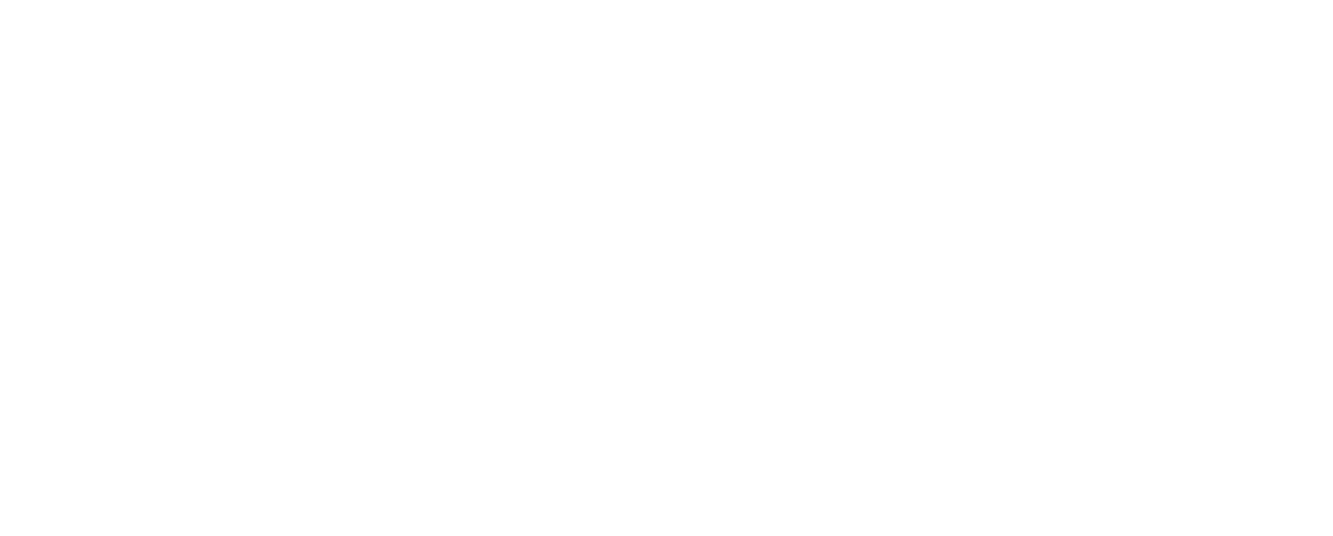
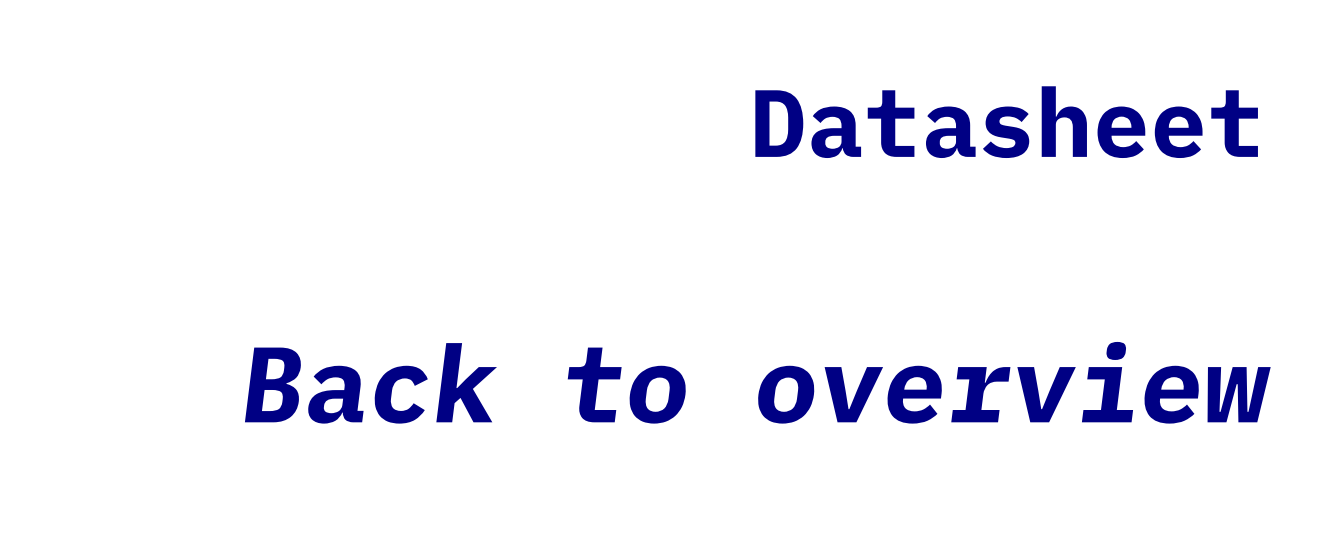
text: none -> Datasheet (1006, 122)
text: none -> Back to overview (757, 382)

